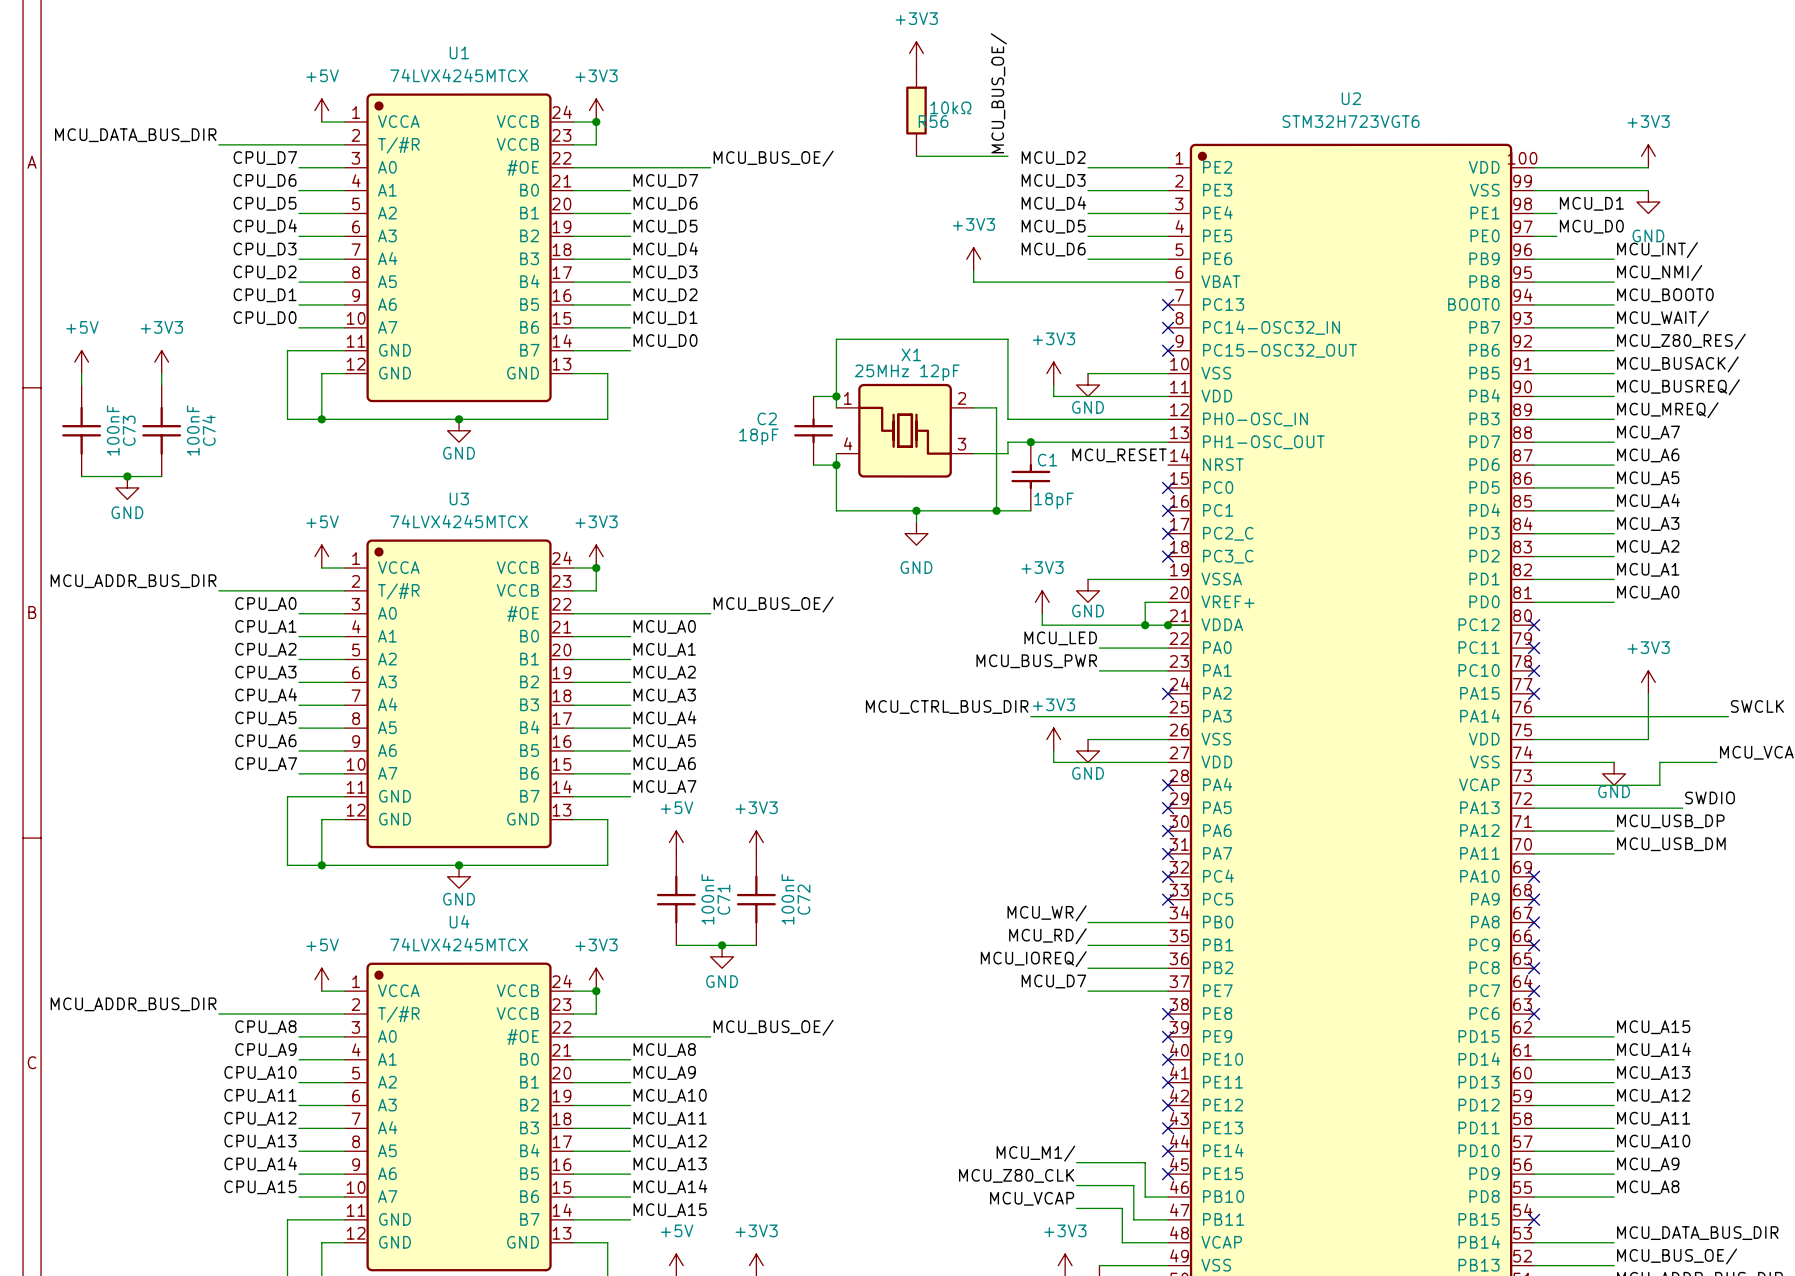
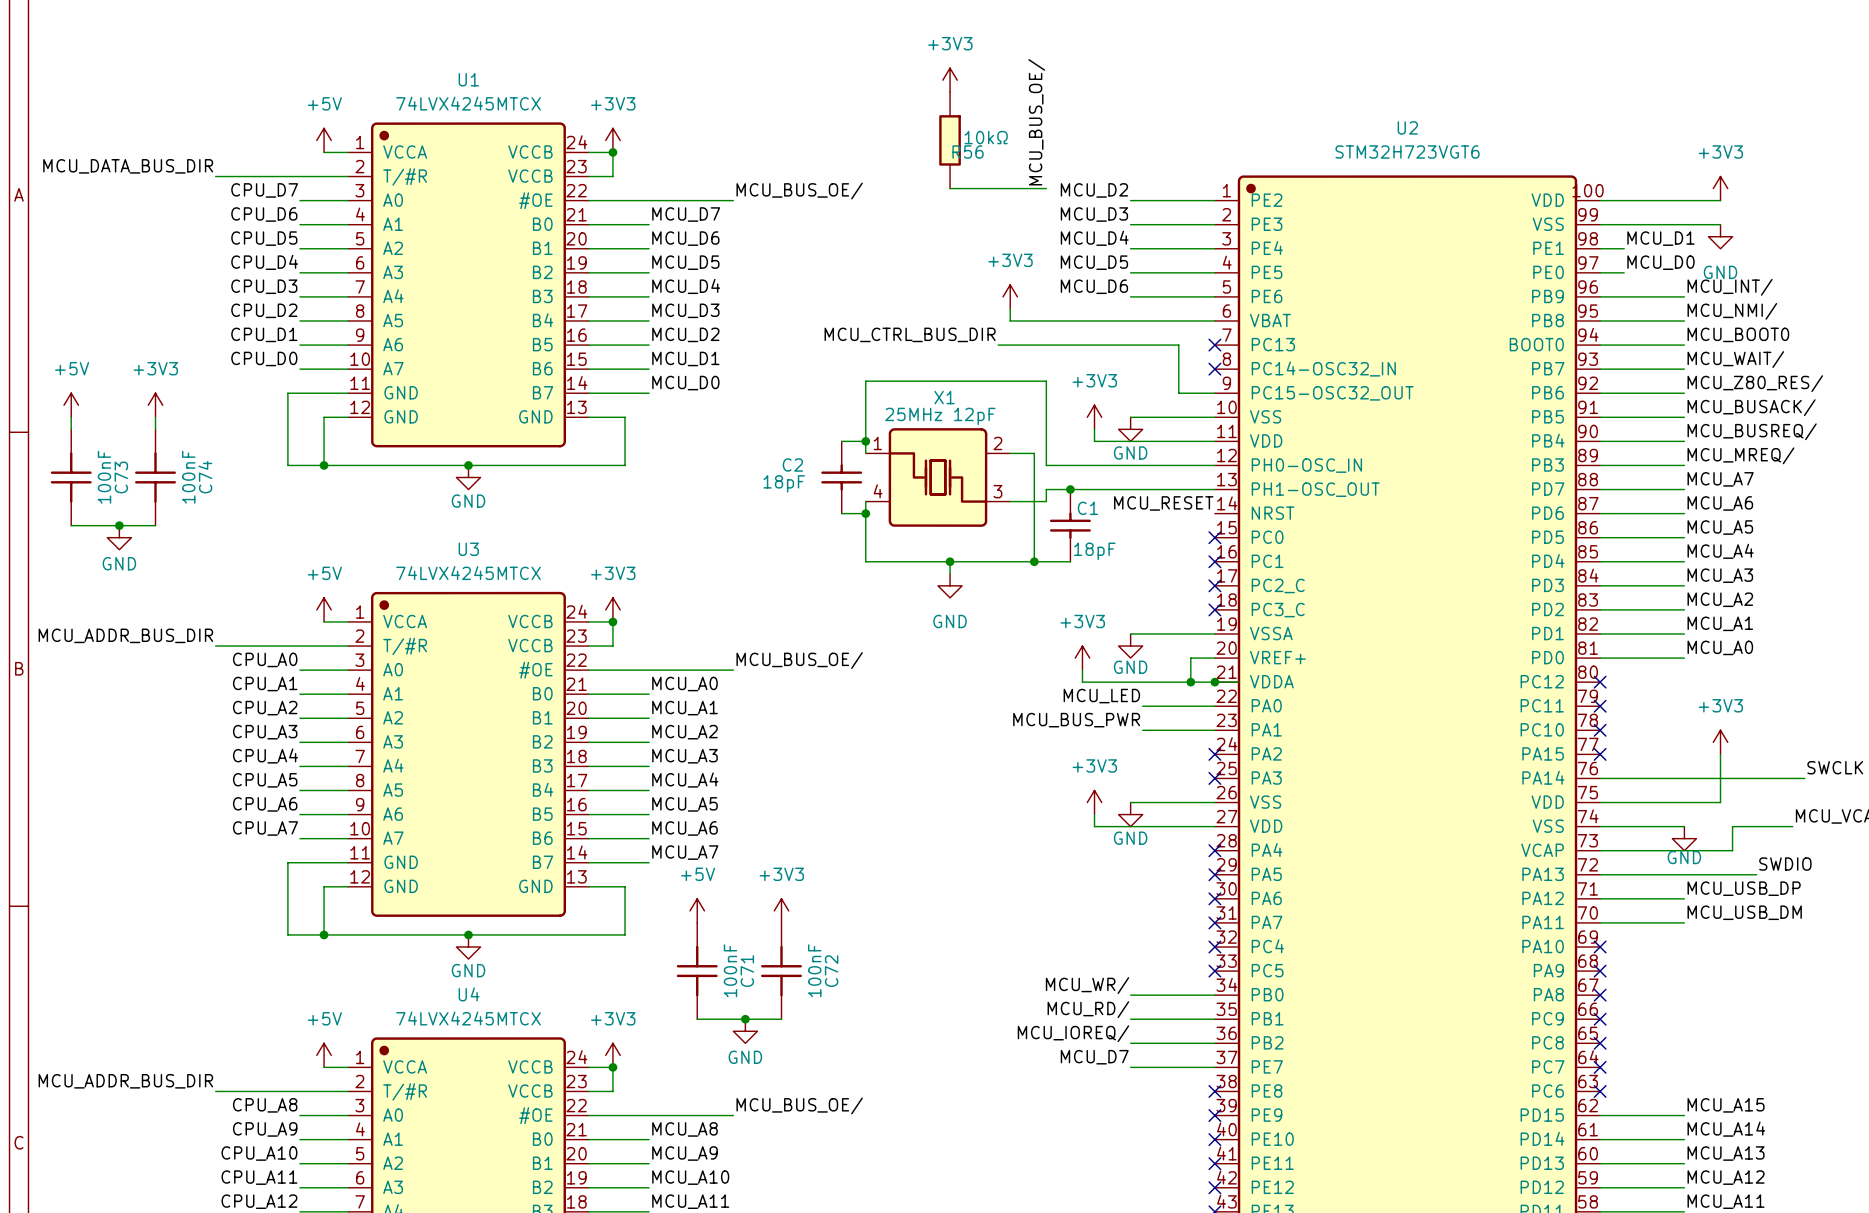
label: none -> MCU_CTRL_BUS_DIR (910, 334)
wire: none -> (998, 345) (1178, 345) (1178, 393) (1214, 393)
no-connect mark: (1168, 350) -> none
label: MCU_CTRL_BUS_DIR (947, 707) -> none
wire: (1030, 716) (1168, 716) -> none
no-connect mark: none -> (1214, 778)

